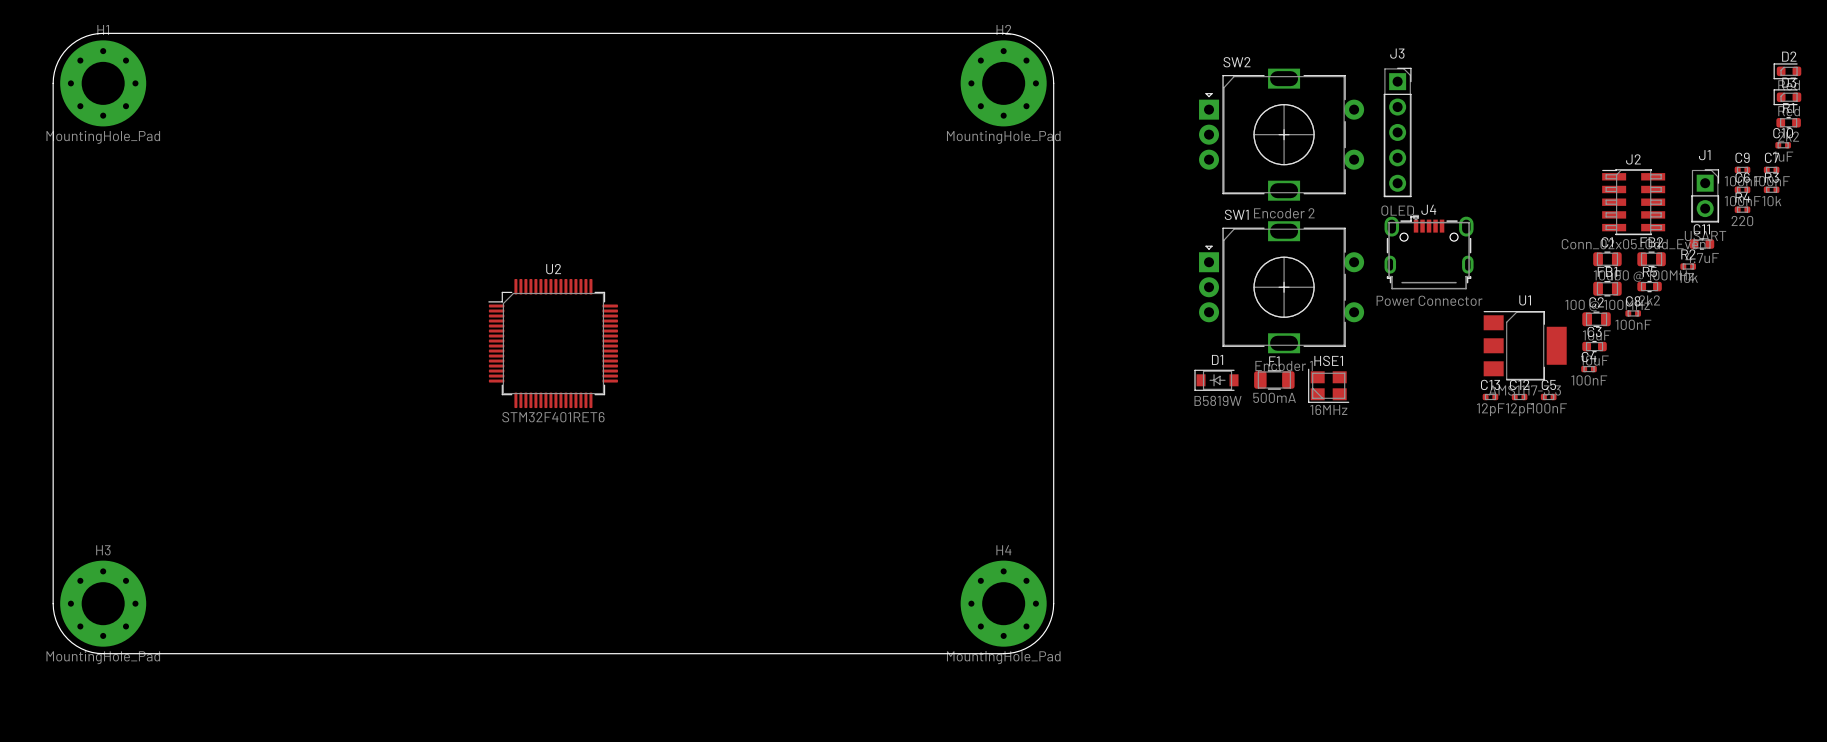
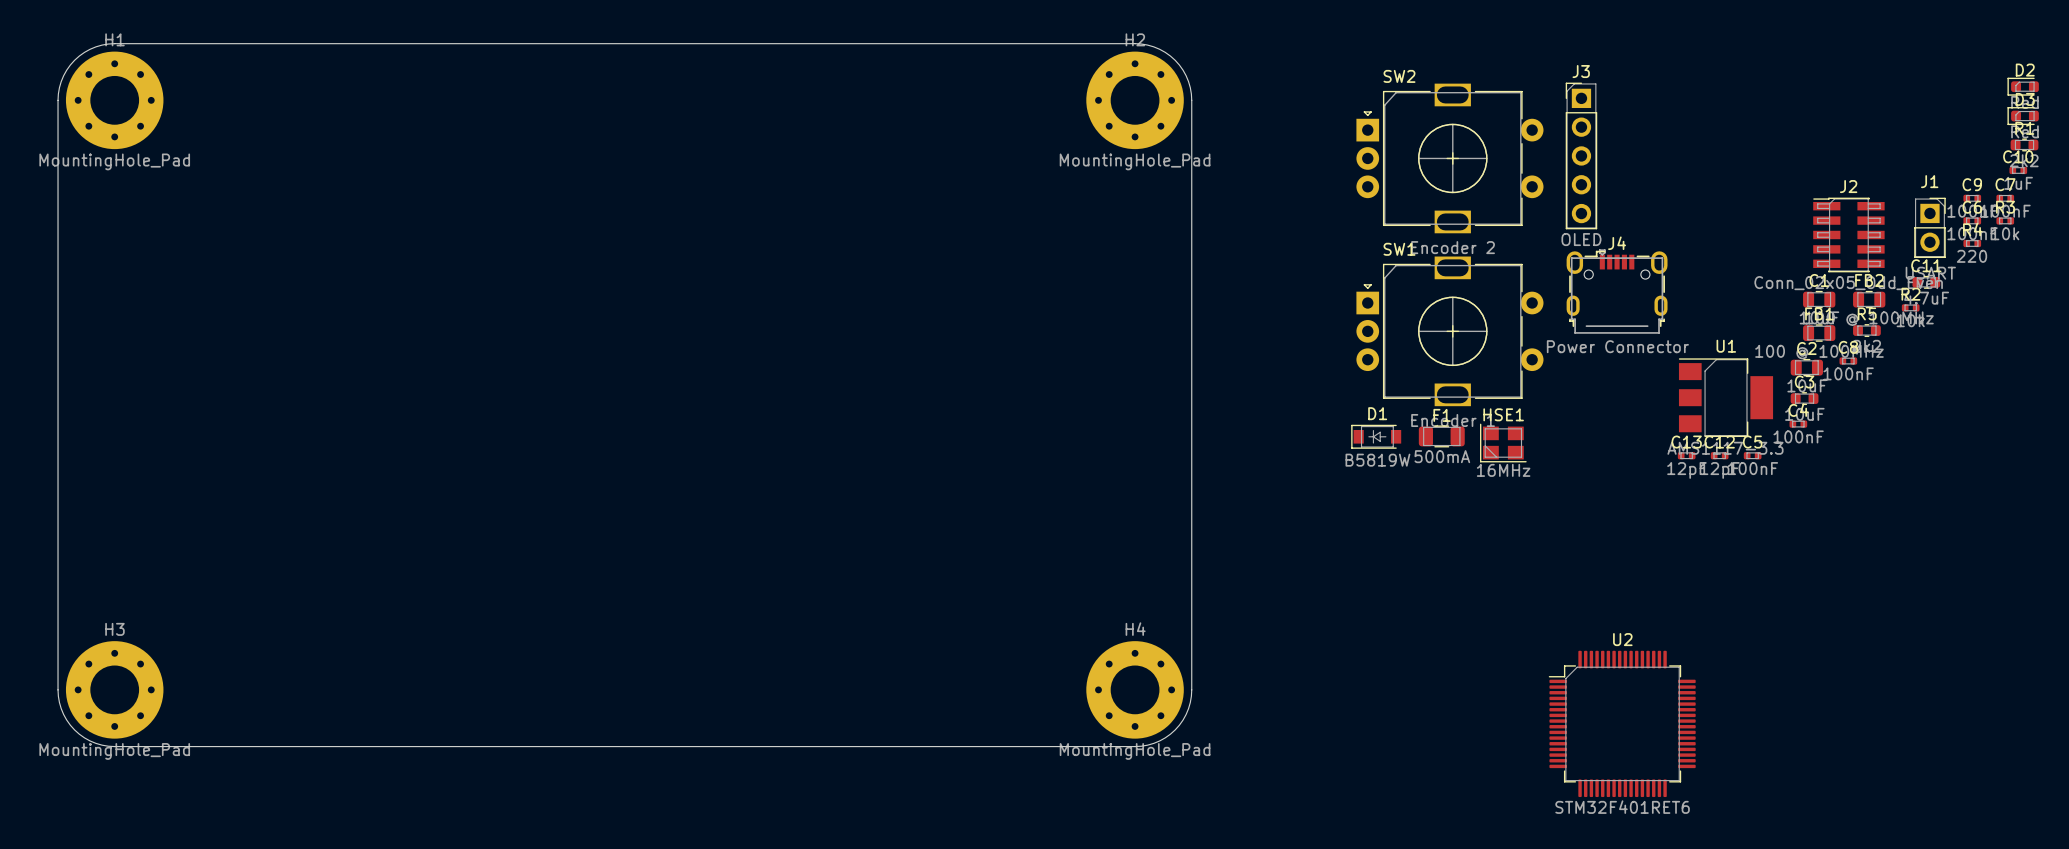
J3 footprint: [1383, 67, 1412, 198] -> [1565, 82, 1598, 230]
U2 position: (553, 343) -> (1622, 723)

